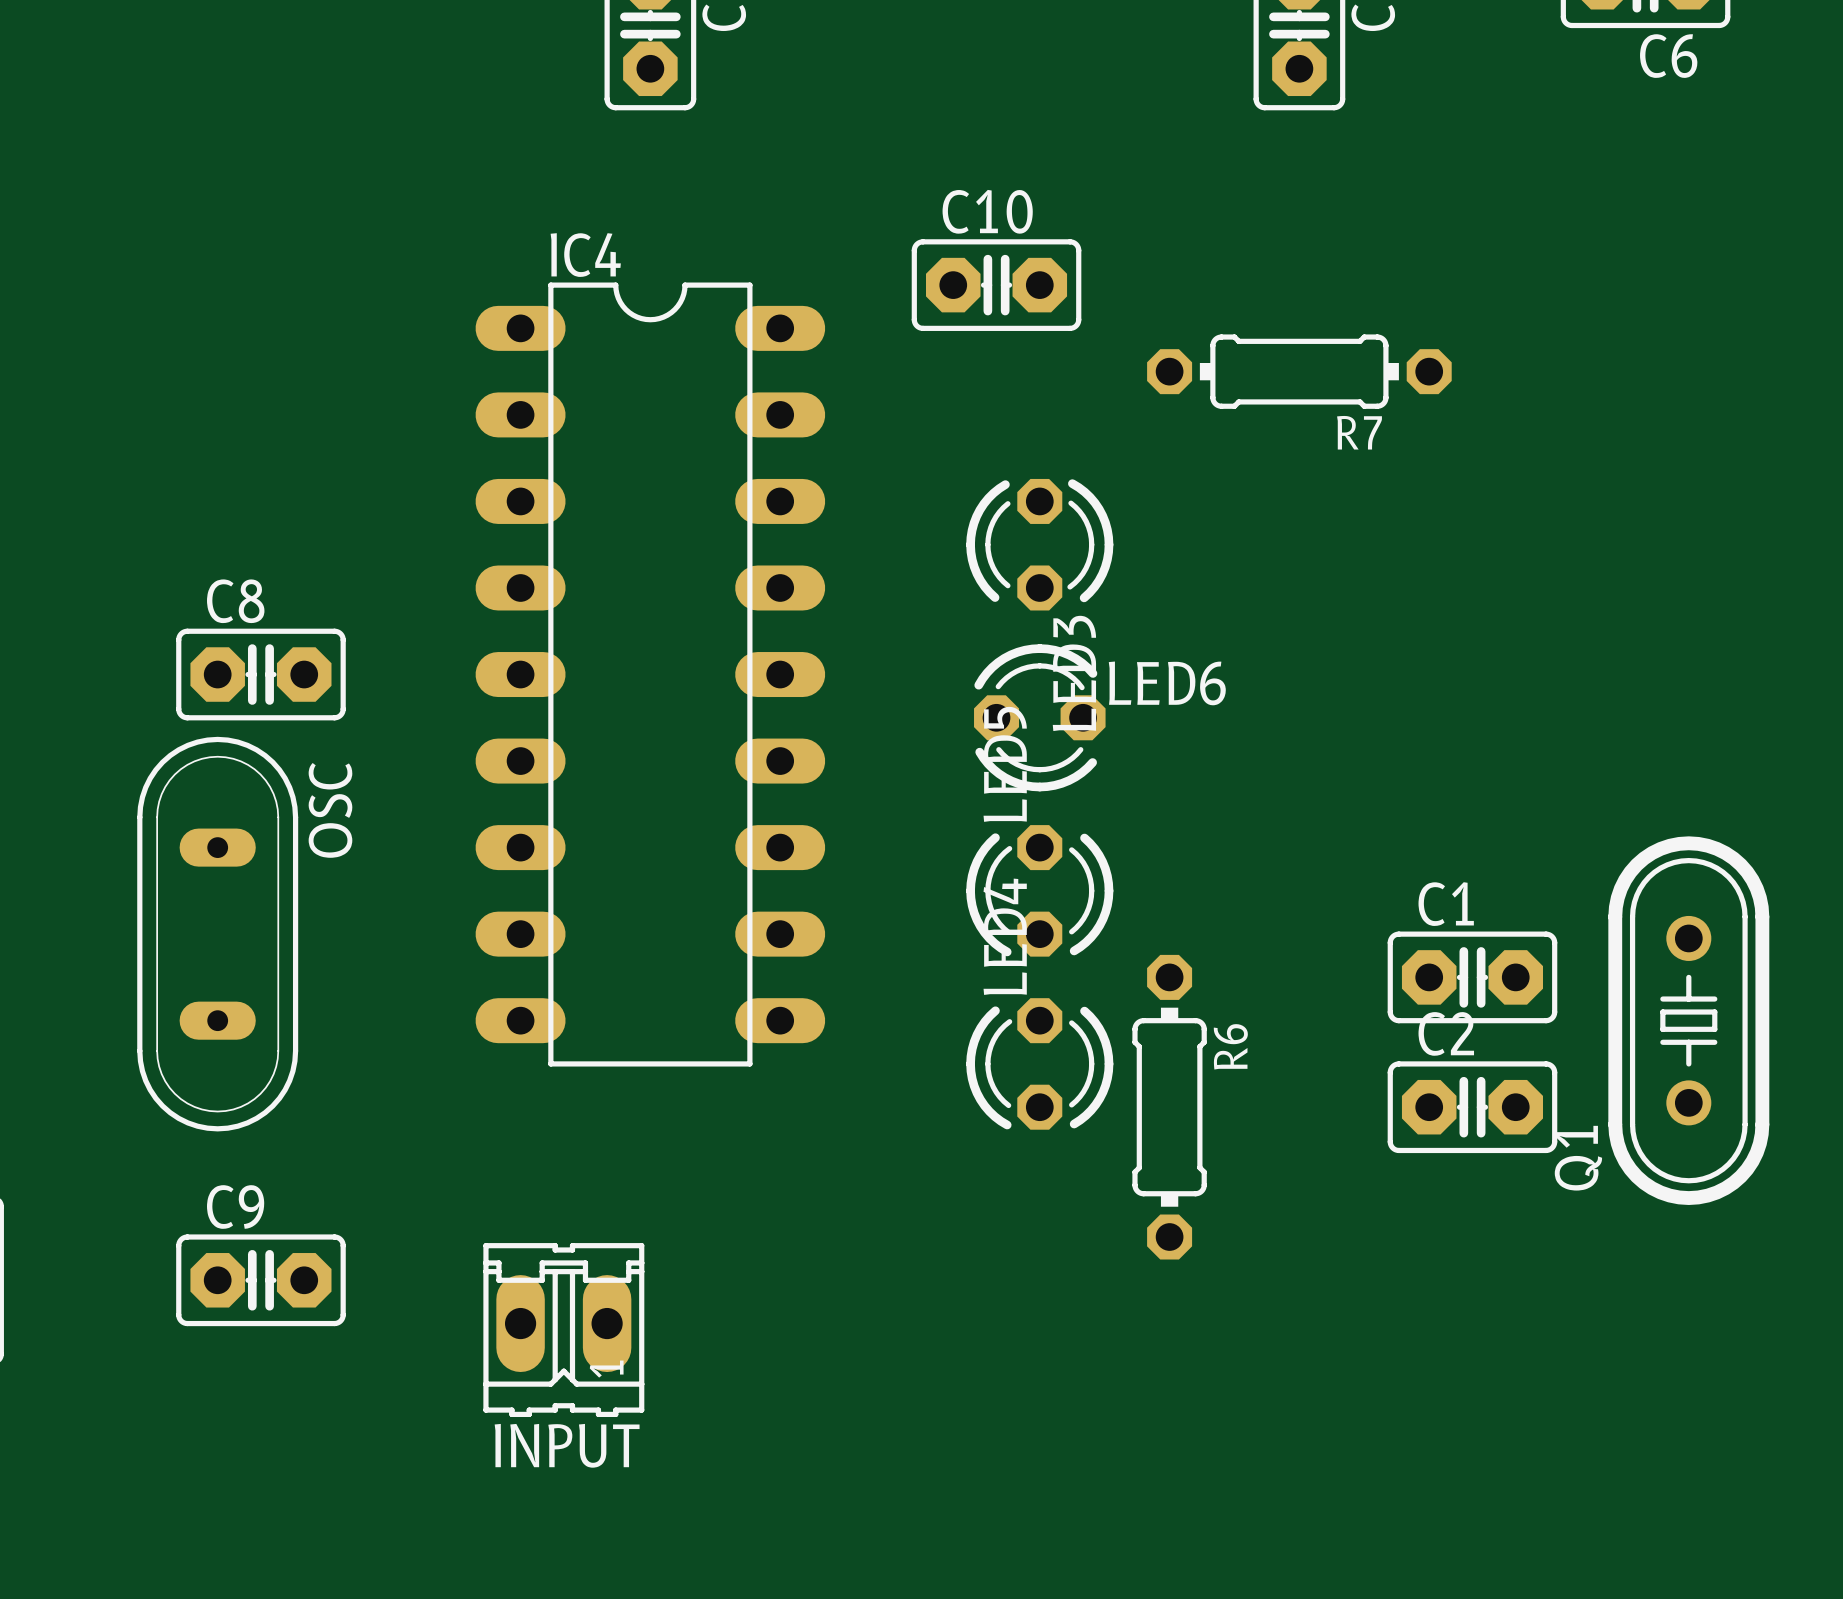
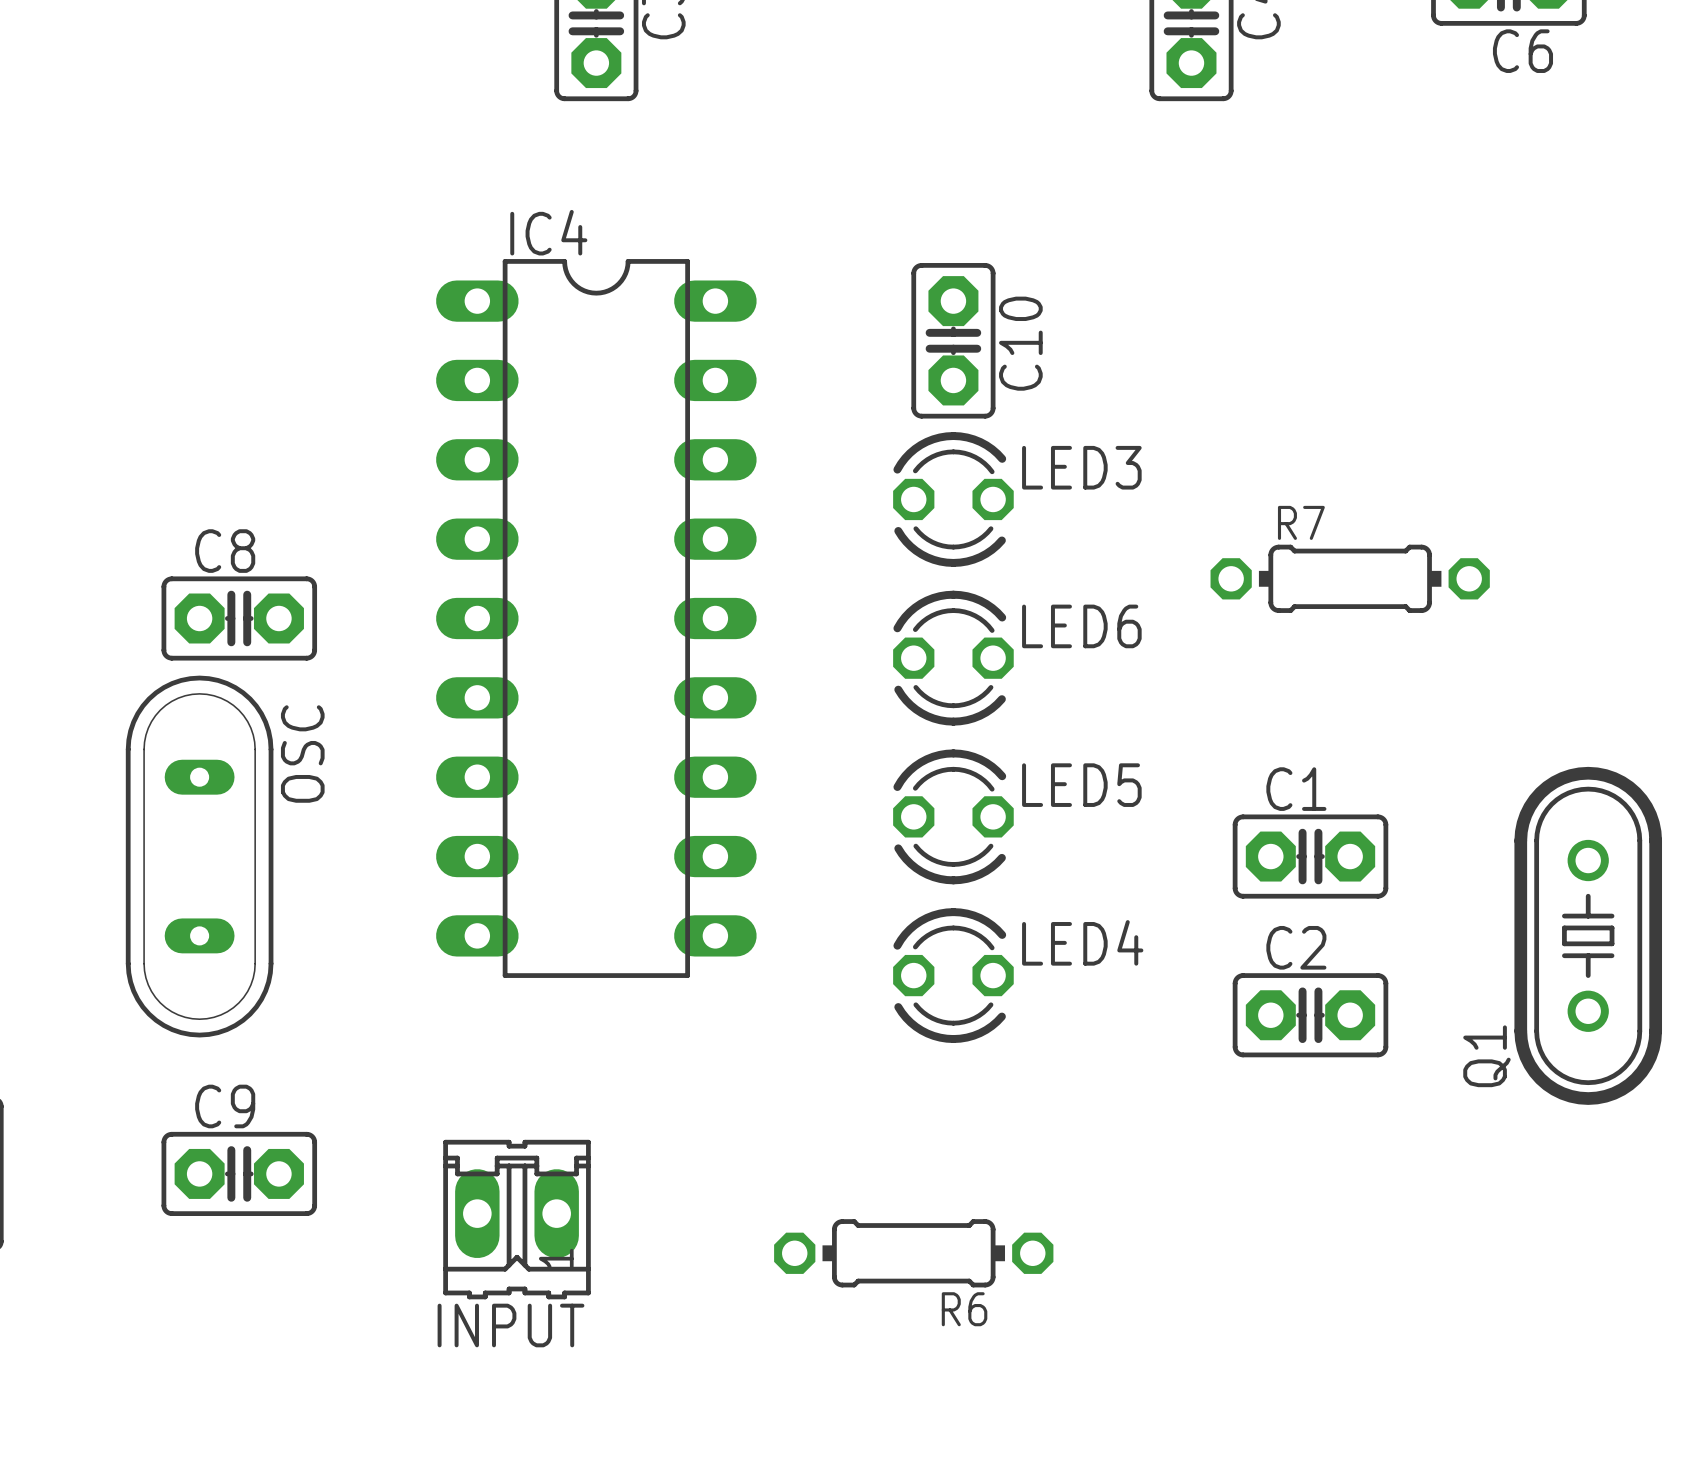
C10 rotation: 0° (996, 285) -> 90° clockwise (953, 340)
R7 position: (1299, 371) -> (1350, 578)
R7 name position: R7 (1359, 432) -> R7 (1301, 522)
LED3 rotation: 0° (1039, 544) -> 90° counterclockwise (953, 499)
LED5 rotation: 0° (1039, 890) -> 90° clockwise (953, 816)
C1 position: (1472, 977) -> (1310, 856)
Q1 position: (1688, 1020) -> (1588, 935)
LED4 rotation: 0° (1039, 1063) -> 90° clockwise (953, 975)
R6 rotation: 0° (1169, 1107) -> 90° clockwise (913, 1253)
R6 position: (1169, 1107) -> (913, 1253)
C2 position: (1472, 1107) -> (1310, 1015)

